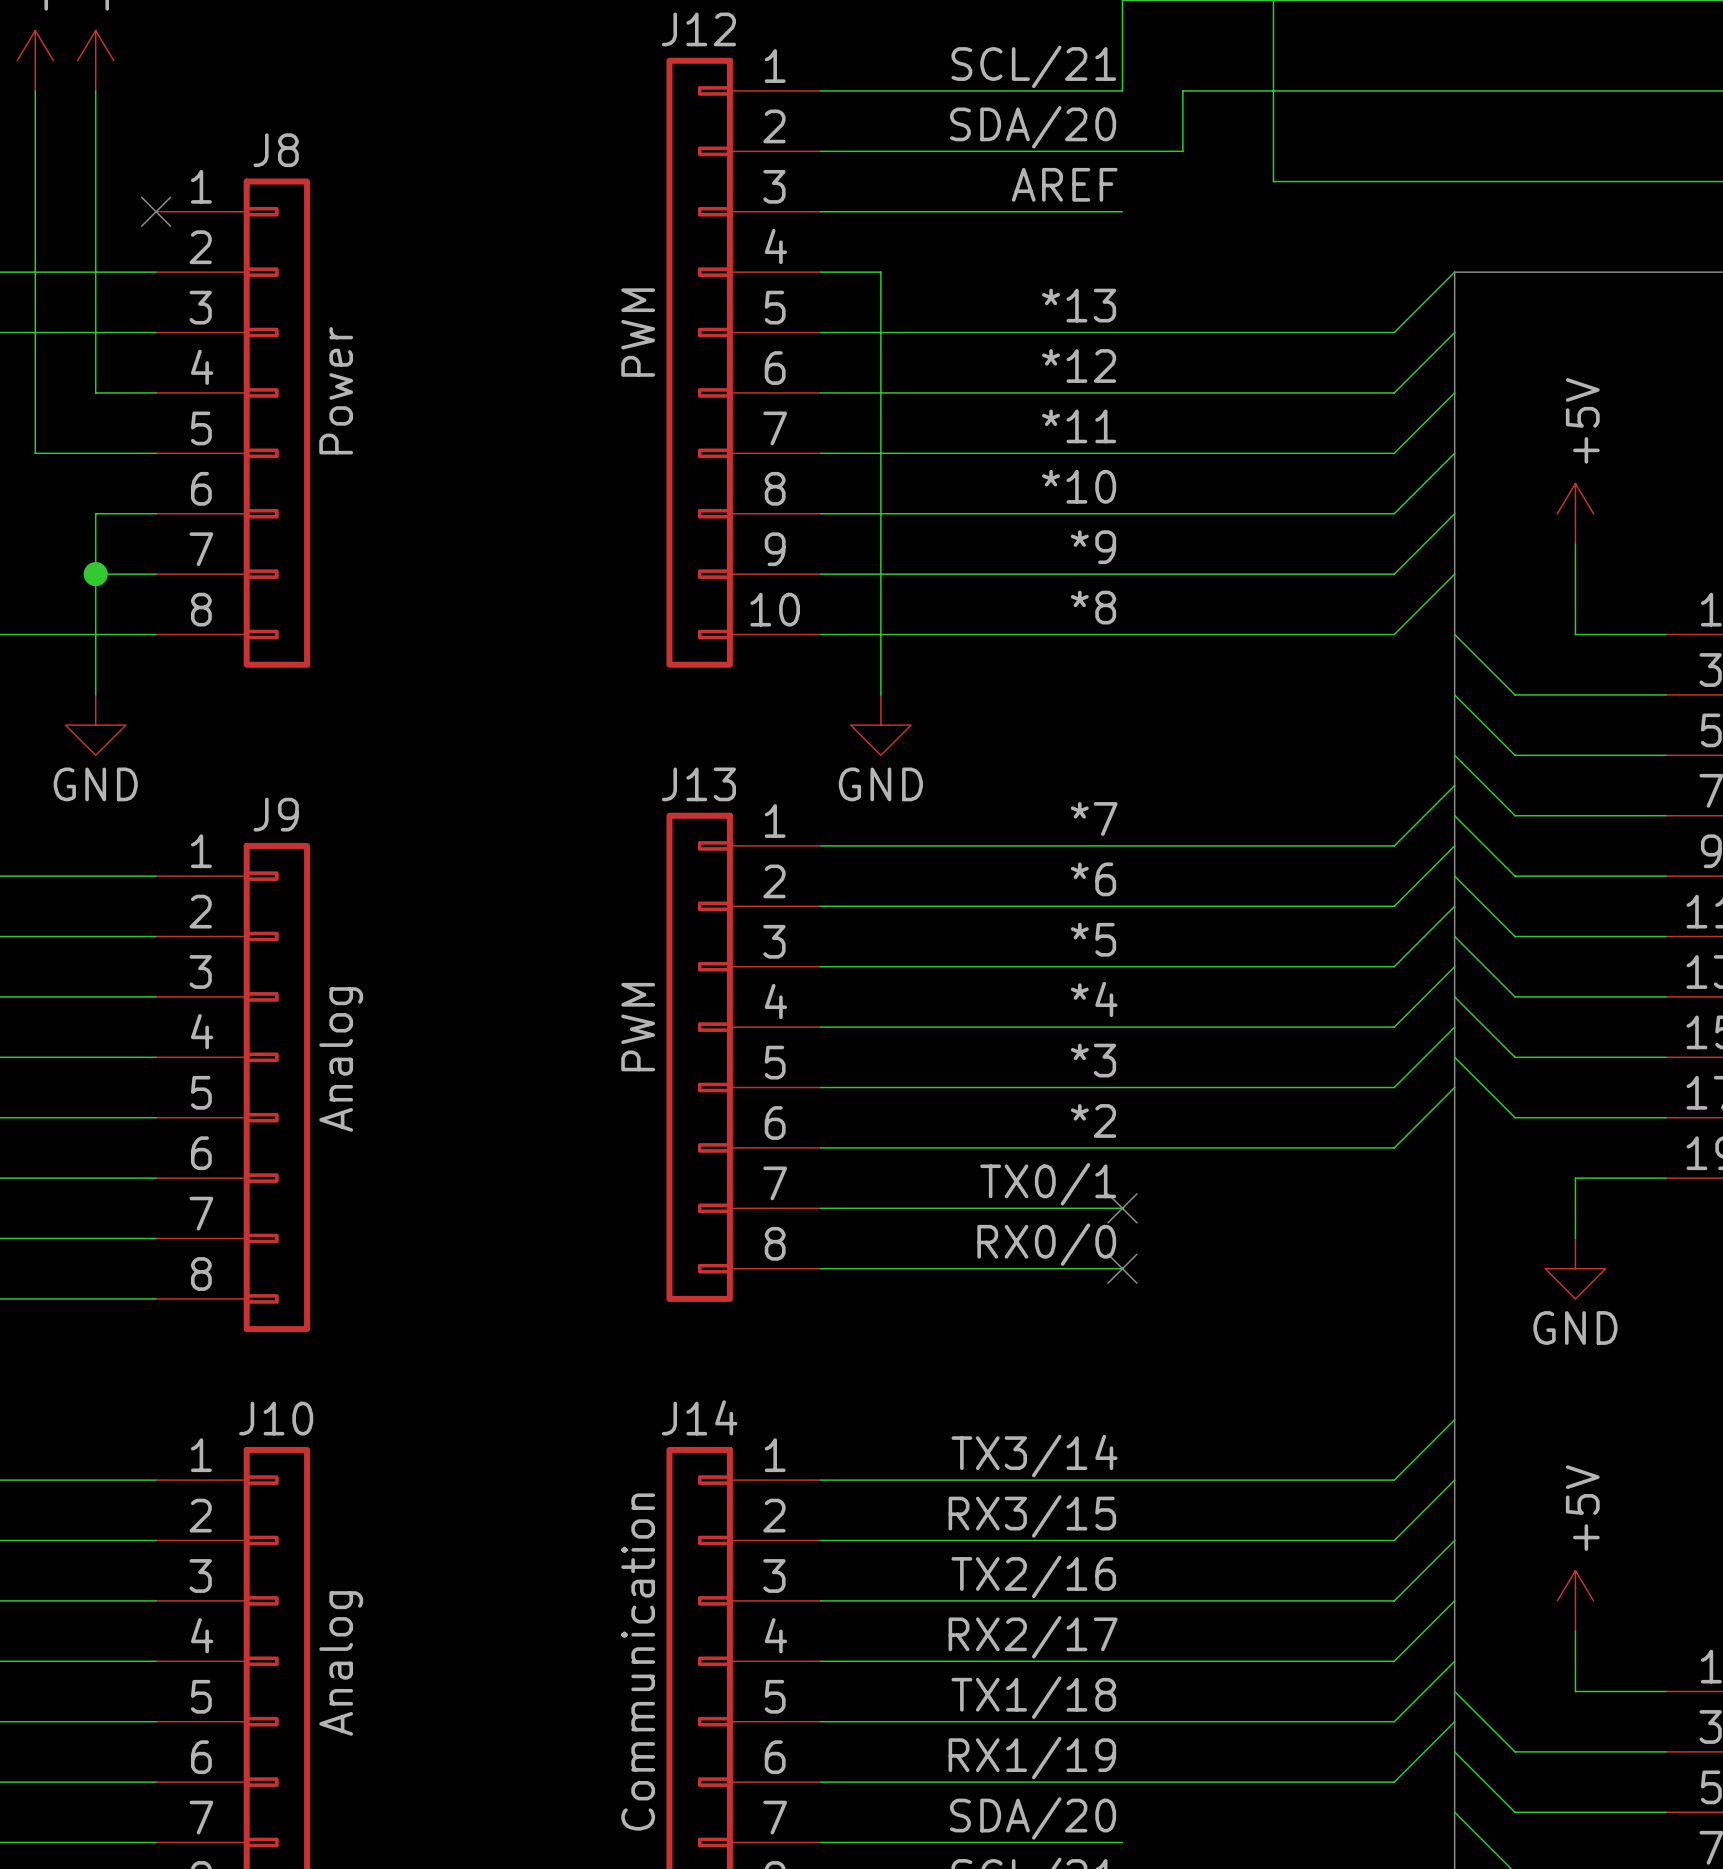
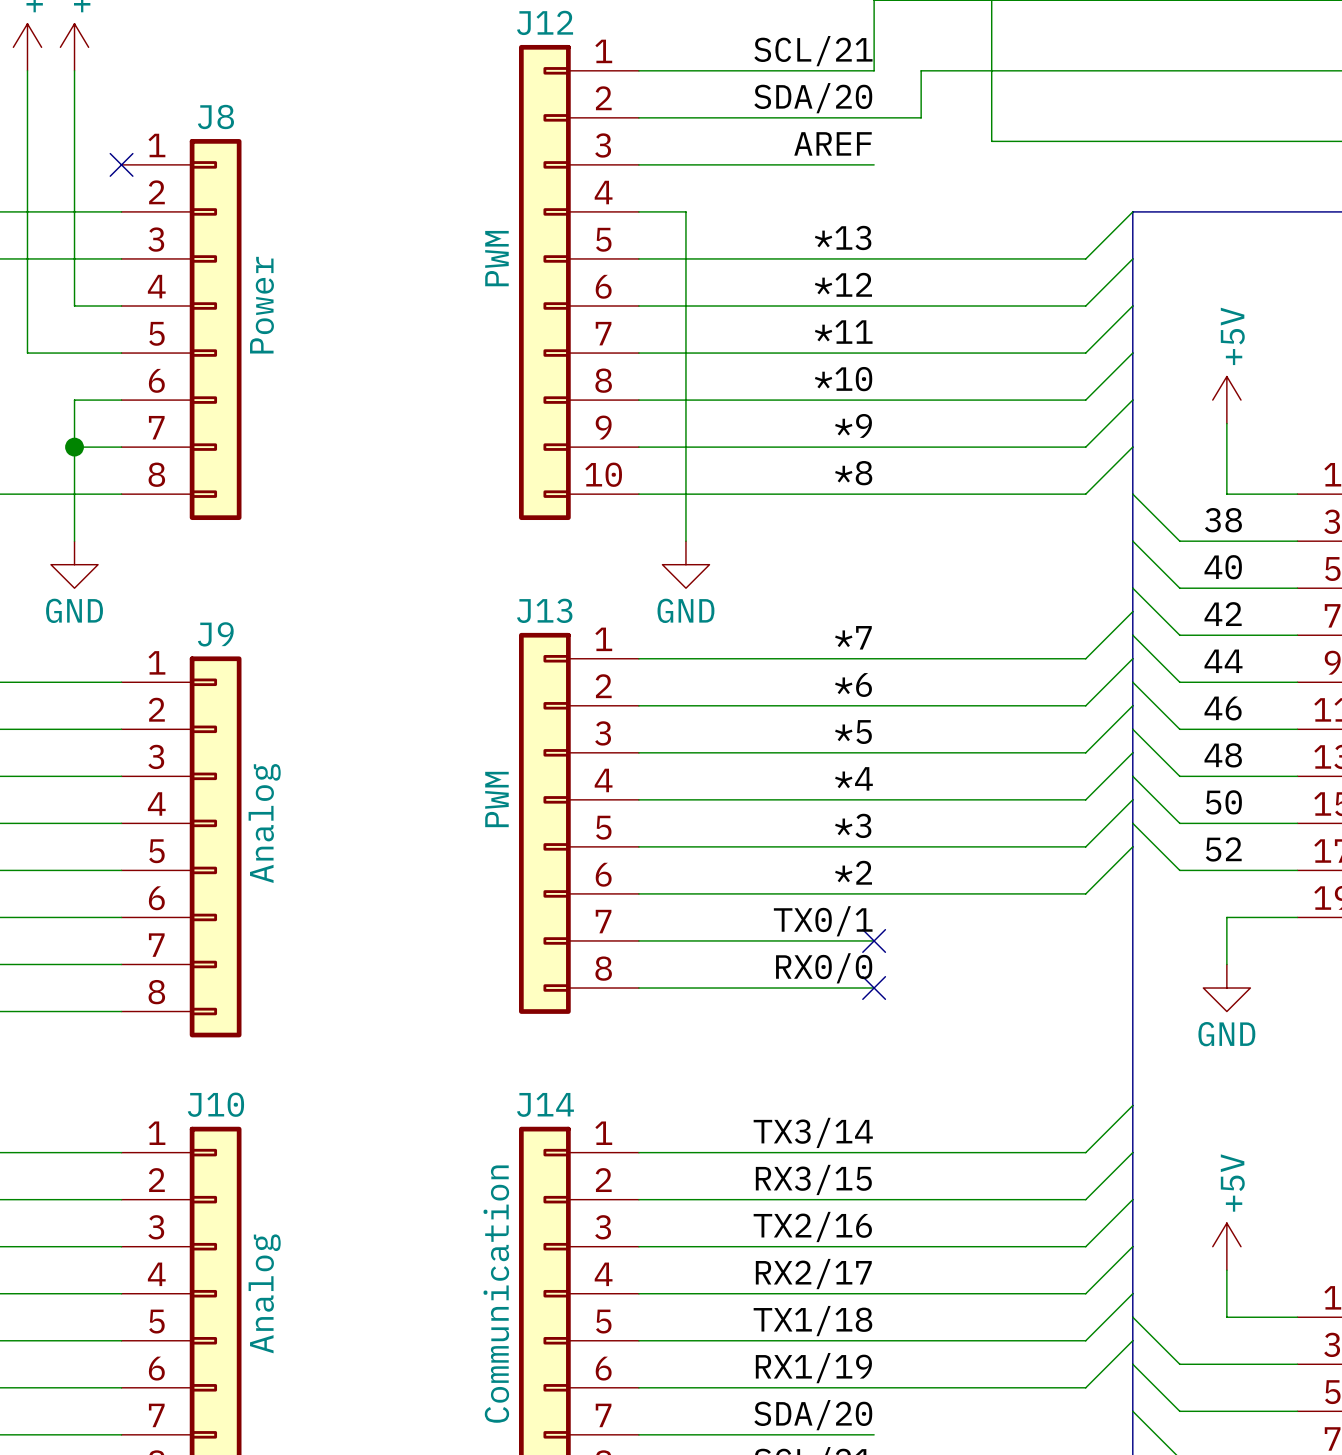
label: none -> 38 (1223, 520)
label: none -> 40 (1223, 567)
label: none -> 42 (1223, 614)
label: none -> 44 (1223, 661)
label: none -> 46 (1223, 708)
label: none -> 48 (1223, 755)
label: none -> 50 (1223, 802)
label: none -> 52 (1223, 849)

